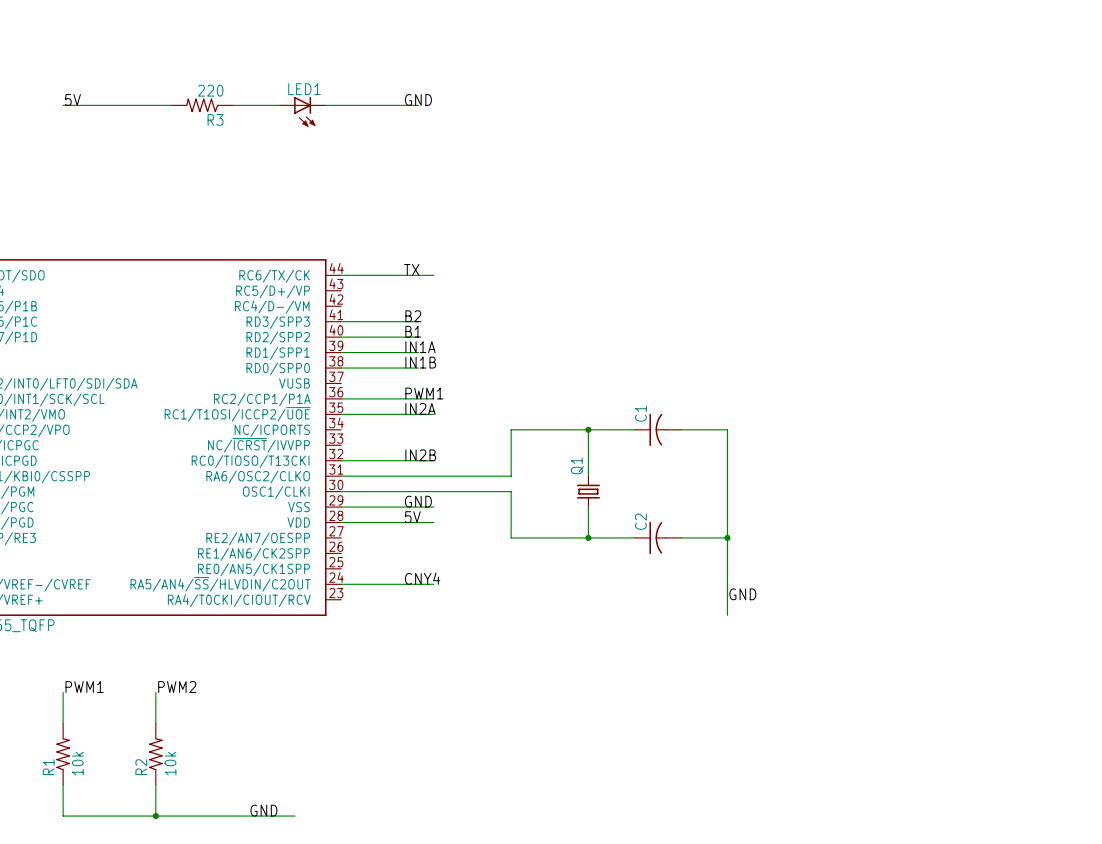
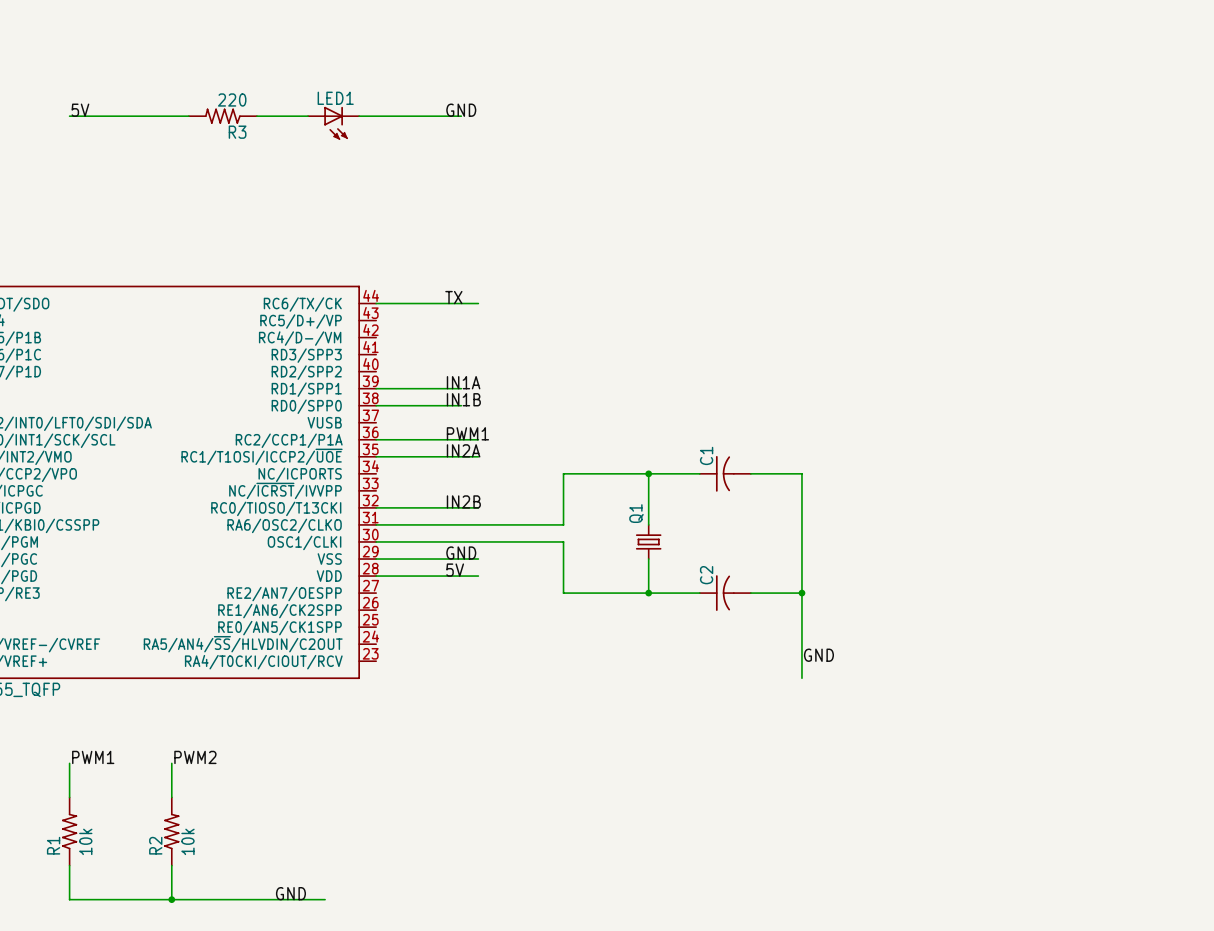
label: B2 (413, 316) -> none
wire: (341, 321) (418, 321) -> none
label: B1 (413, 331) -> none
wire: (341, 337) (418, 337) -> none
label: CNY4 (422, 578) -> none
wire: (341, 584) (433, 584) -> none

